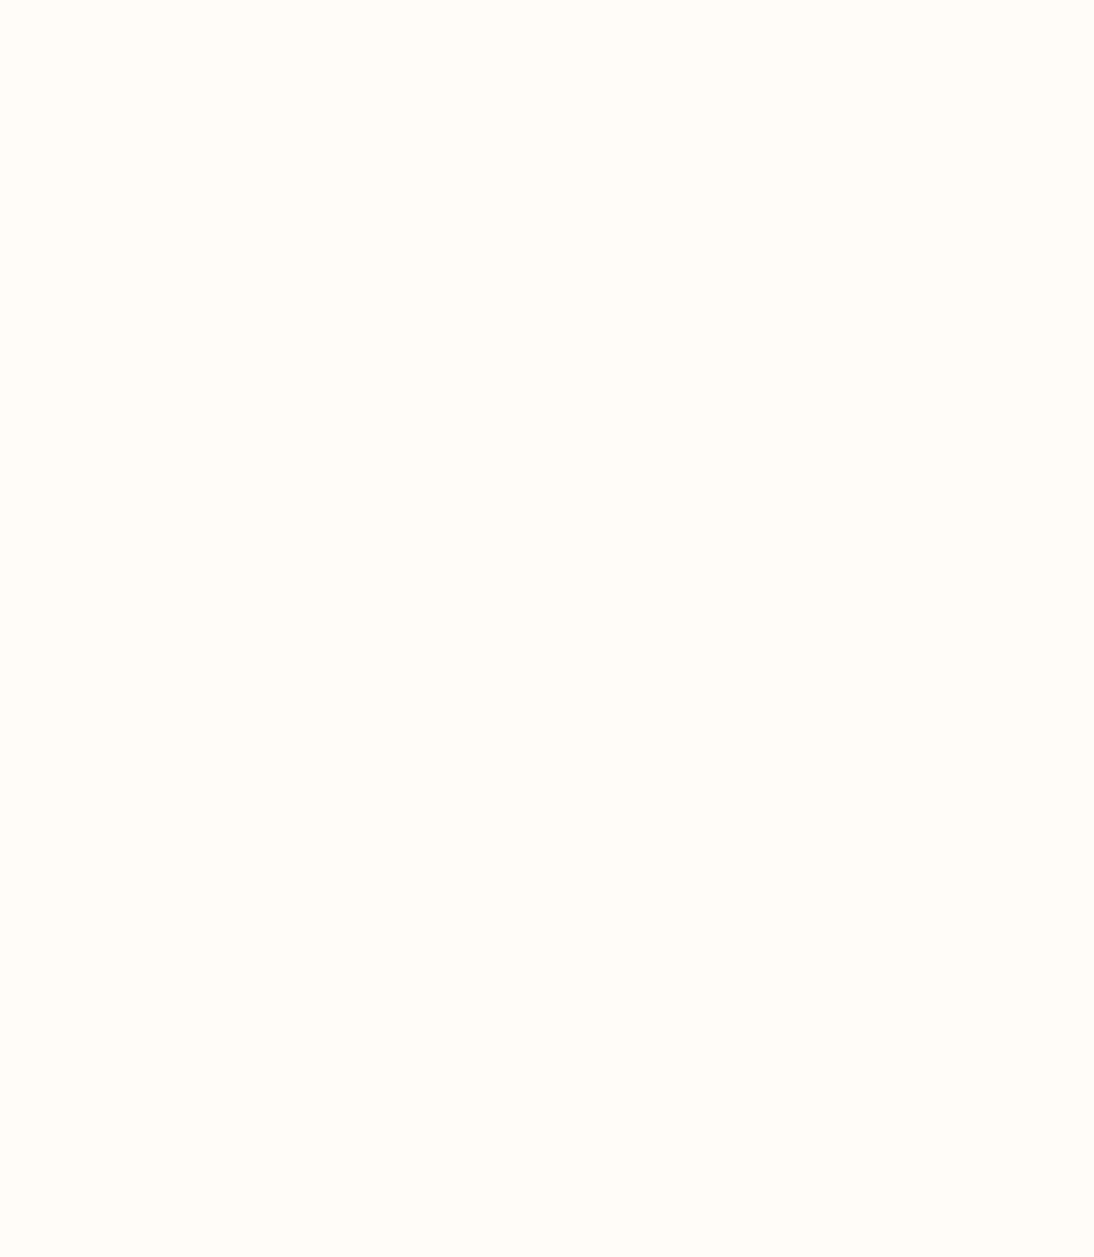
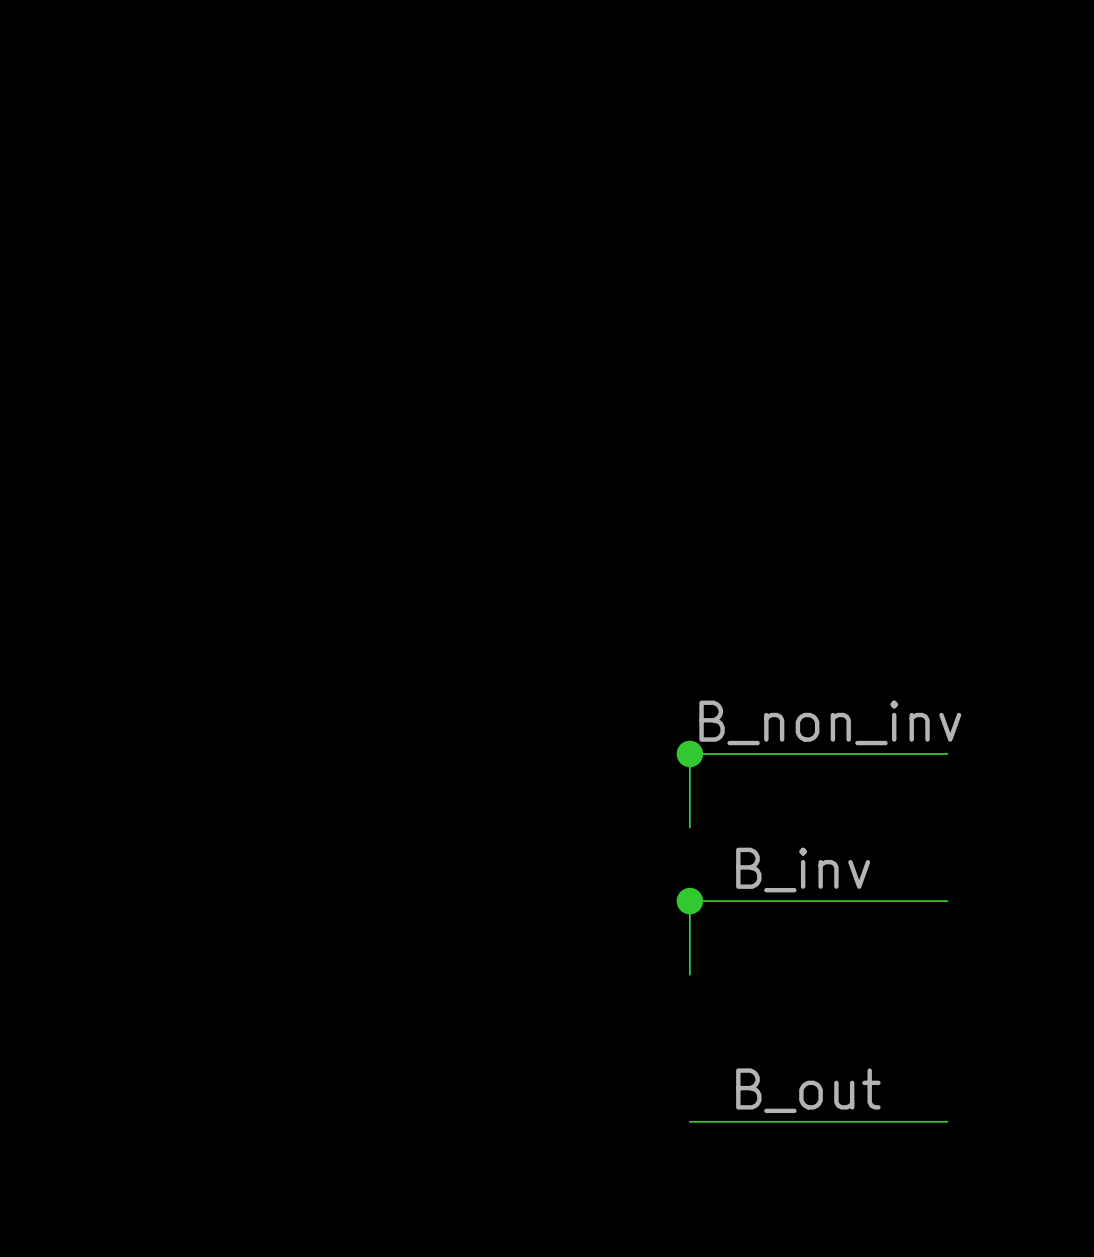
label: none -> B_non_inv (830, 722)
junction: none -> (689, 753)
wire: none -> (947, 753) (689, 753) (689, 827)
label: none -> B_inv (803, 870)
junction: none -> (689, 901)
wire: none -> (947, 901) (689, 901) (689, 974)
label: none -> B_out (808, 1090)
wire: none -> (689, 1121) (947, 1121)

